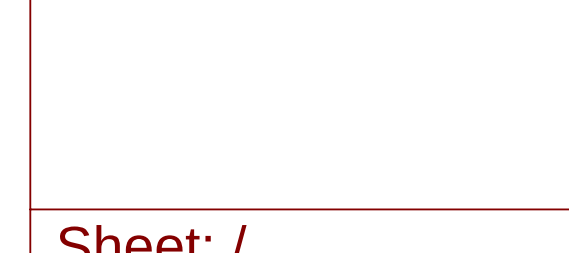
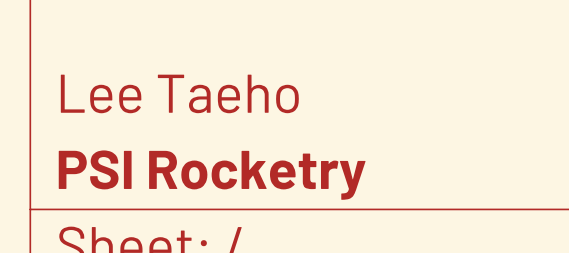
title block: none -> Lee Taeho (179, 93)
title block: none -> PSI Rocketry (212, 175)

